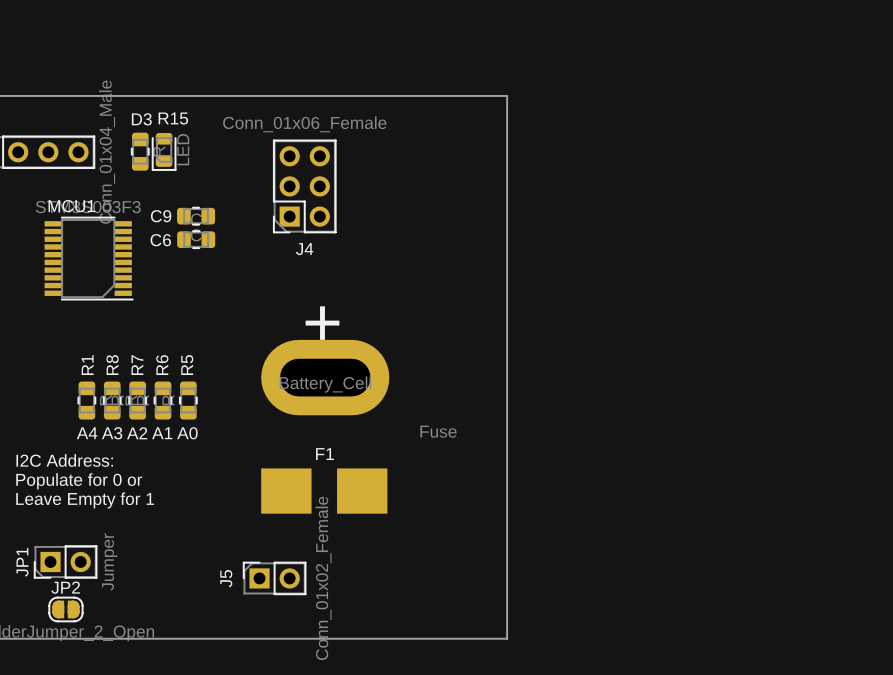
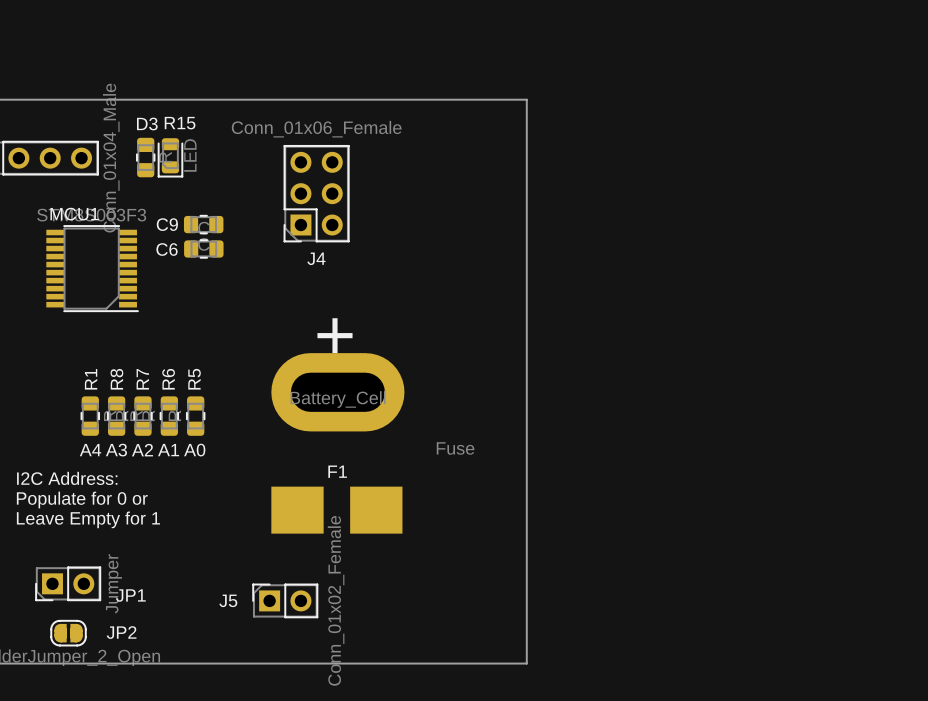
JP1 name rotation: 0° (22, 562) -> 90° clockwise (130, 595)
JP1 name position: JP1 (22, 562) -> JP1 (130, 595)
J5 name rotation: 0° (226, 578) -> 90° clockwise (228, 600)
JP2 name position: JP2 (65, 587) -> JP2 (121, 632)

